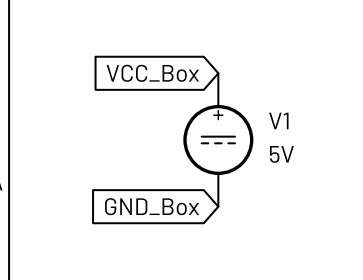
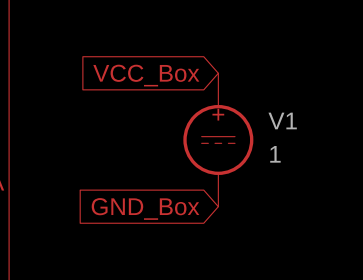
V1 value: 5V (281, 154) -> 1 (275, 154)

